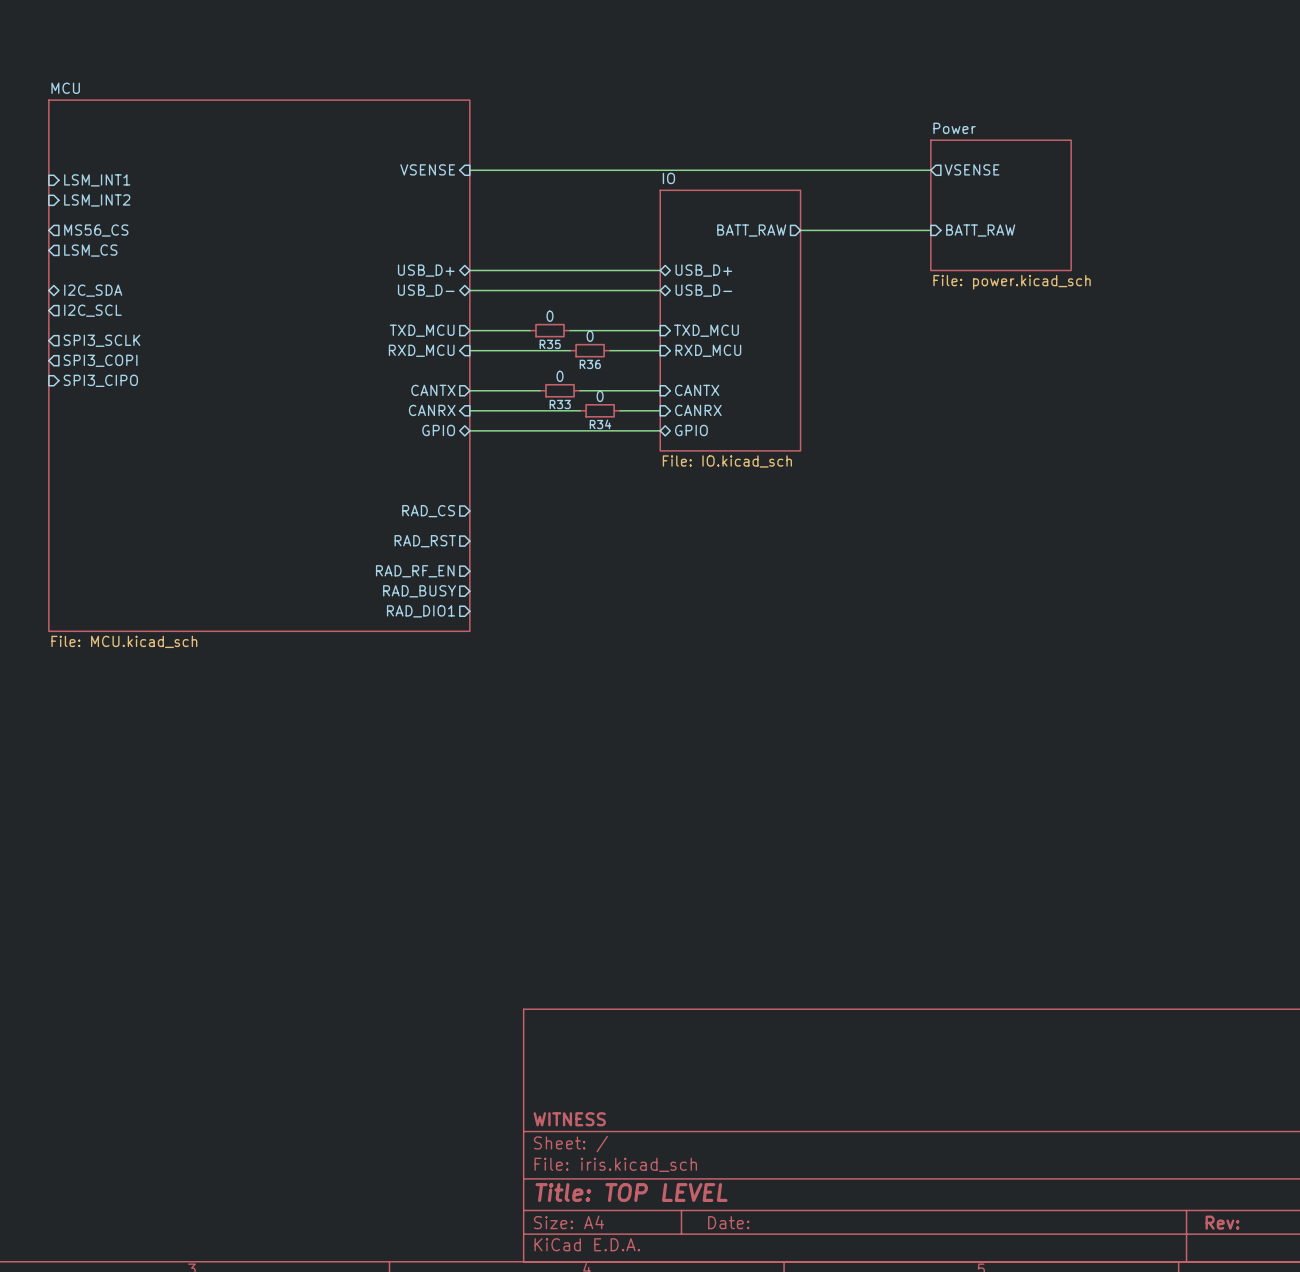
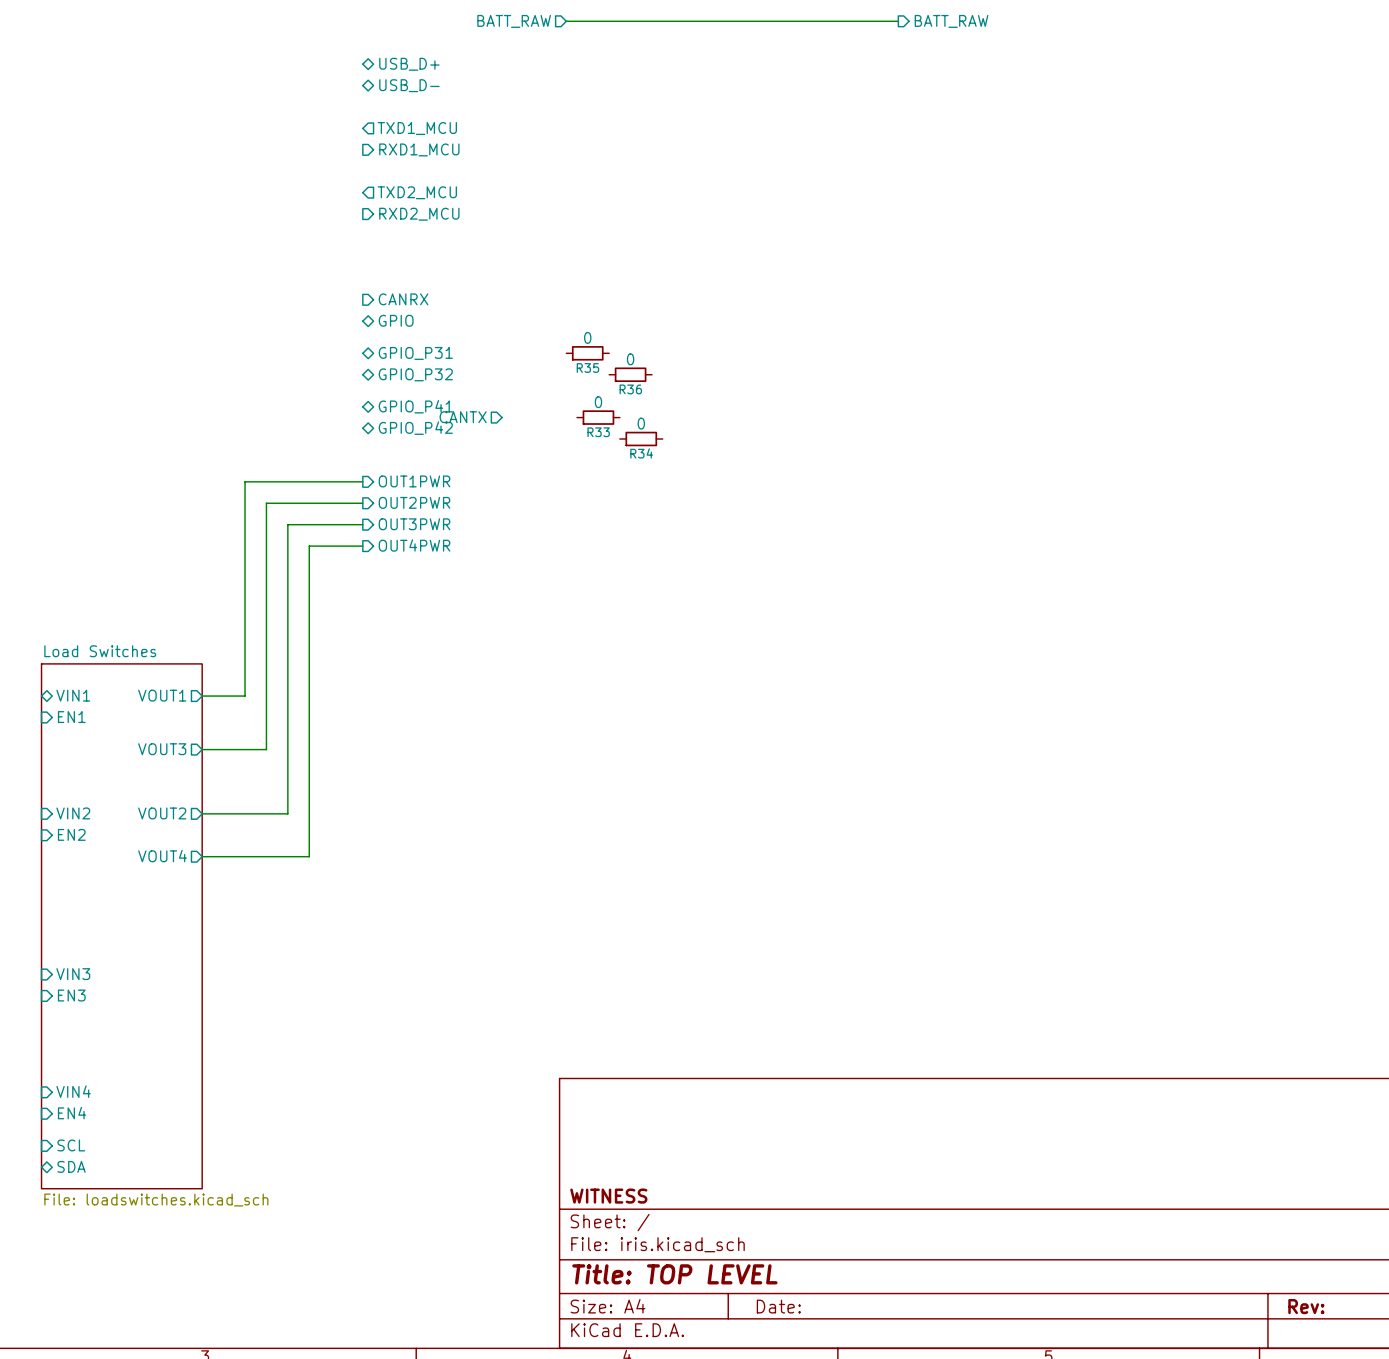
wire: none -> (566, 21) (898, 21)
sheet pin: none -> BATT_RAW (514, 21)
sheet pin: none -> BATT_RAW (951, 21)
sheet pin: none -> USB_D+ (409, 64)
sheet pin: none -> USB_D- (409, 85)
sheet pin: none -> TXD1_MCU (417, 128)
sheet pin: none -> RXD1_MCU (419, 149)
sheet pin: VSENSE (427, 169) -> none
sheet pin: VSENSE (972, 169) -> none
wire: (469, 170) (930, 170) -> none
sheet pin: LSM_INT1 (97, 180) -> none
sheet pin: none -> TXD2_MCU (417, 192)
sheet pin: LSM_INT2 (97, 200) -> none
sheet pin: none -> RXD2_MCU (419, 214)
sheet Power: File: power.kicad_sch (1001, 205) -> none
sheet pin: MS56_CS (96, 230) -> none
sheet pin: BATT_RAW (751, 230) -> none
wire: (800, 230) (930, 230) -> none
sheet pin: BATT_RAW (980, 230) -> none
sheet pin: LSM_CS (90, 250) -> none
sheet pin: USB_D+ (426, 270) -> none
wire: (469, 270) (660, 270) -> none
sheet pin: USB_D+ (703, 270) -> none
sheet pin: I2C_SDA (93, 290) -> none
sheet pin: USB_D- (426, 290) -> none
wire: (469, 290) (660, 290) -> none
sheet pin: USB_D- (703, 290) -> none
sheet pin: I2C_SCL (92, 310) -> none
sheet IO: File: IO.kicad_sch (730, 320) -> none
sheet pin: none -> GPIO_P31 (415, 353)
sheet pin: TXD_MCU (422, 330) -> none
wire: (469, 330) (529, 330) -> none
wire: (570, 330) (660, 330) -> none
sheet pin: TXD_MCU (706, 330) -> none
sheet pin: SPI3_SCLK (102, 340) -> none
sheet pin: none -> GPIO_P32 (415, 374)
sheet pin: RXD_MCU (421, 350) -> none
wire: (469, 350) (570, 350) -> none
wire: (610, 350) (660, 350) -> none
sheet pin: RXD_MCU (708, 350) -> none
sheet pin: SPI3_COPI (100, 360) -> none
sheet MCU: File: MCU.kicad_sch (259, 365) -> none
sheet pin: SPI3_CIPO (100, 380) -> none
sheet pin: none -> GPIO_P41 (415, 406)
wire: (469, 390) (539, 390) -> none
wire: (580, 390) (660, 390) -> none
sheet pin: CANTX (697, 390) -> none
sheet pin: none -> GPIO_P42 (415, 428)
sheet pin rotation: 0° (432, 410) -> 180° (403, 299)
sheet pin position: CANRX (432, 410) -> CANRX (403, 299)
wire: (469, 410) (580, 410) -> none
wire: (620, 410) (660, 410) -> none
sheet pin: CANRX (698, 410) -> none
sheet pin rotation: 0° (438, 430) -> 180° (396, 320)
sheet pin position: GPIO (438, 430) -> GPIO (396, 320)
wire: (469, 430) (660, 430) -> none
sheet pin: GPIO (691, 430) -> none
wire: none -> (362, 481) (245, 481) (245, 696) (202, 696)
sheet pin: none -> OUT1PWR (414, 481)
wire: none -> (362, 503) (266, 503) (266, 749) (202, 749)
sheet pin: none -> OUT2PWR (414, 502)
wire: none -> (362, 524) (287, 524) (287, 813) (202, 813)
sheet pin: none -> OUT3PWR (414, 524)
sheet pin: none -> OUT4PWR (414, 545)
wire: none -> (362, 546) (309, 546) (309, 856) (202, 856)
sheet pin: RAD_CS (428, 511) -> none
sheet pin: RAD_RST (425, 541) -> none
sheet pin: RAD_RF_EN (415, 571) -> none
sheet pin: RAD_BUSY (419, 591) -> none
sheet pin: RAD_DIO1 (420, 611) -> none
sheet pin: none -> VIN1 (73, 695)
sheet pin: none -> VOUT1 (162, 695)
sheet pin: none -> EN1 (71, 717)
sheet pin: none -> VOUT3 (162, 749)
sheet pin: none -> VIN2 (73, 813)
sheet pin: none -> VOUT2 (162, 813)
sheet pin: none -> EN2 (71, 834)
sheet pin: none -> VOUT4 (162, 856)
sheet Load Switches: none -> File: loadswitches.kicad_sch (121, 926)
sheet pin: none -> VIN3 (73, 974)
sheet pin: none -> EN3 (71, 995)
sheet pin: none -> VIN4 (73, 1091)
sheet pin: none -> EN4 (72, 1113)
sheet pin: none -> SCL (71, 1145)
sheet pin: none -> SDA (71, 1166)

